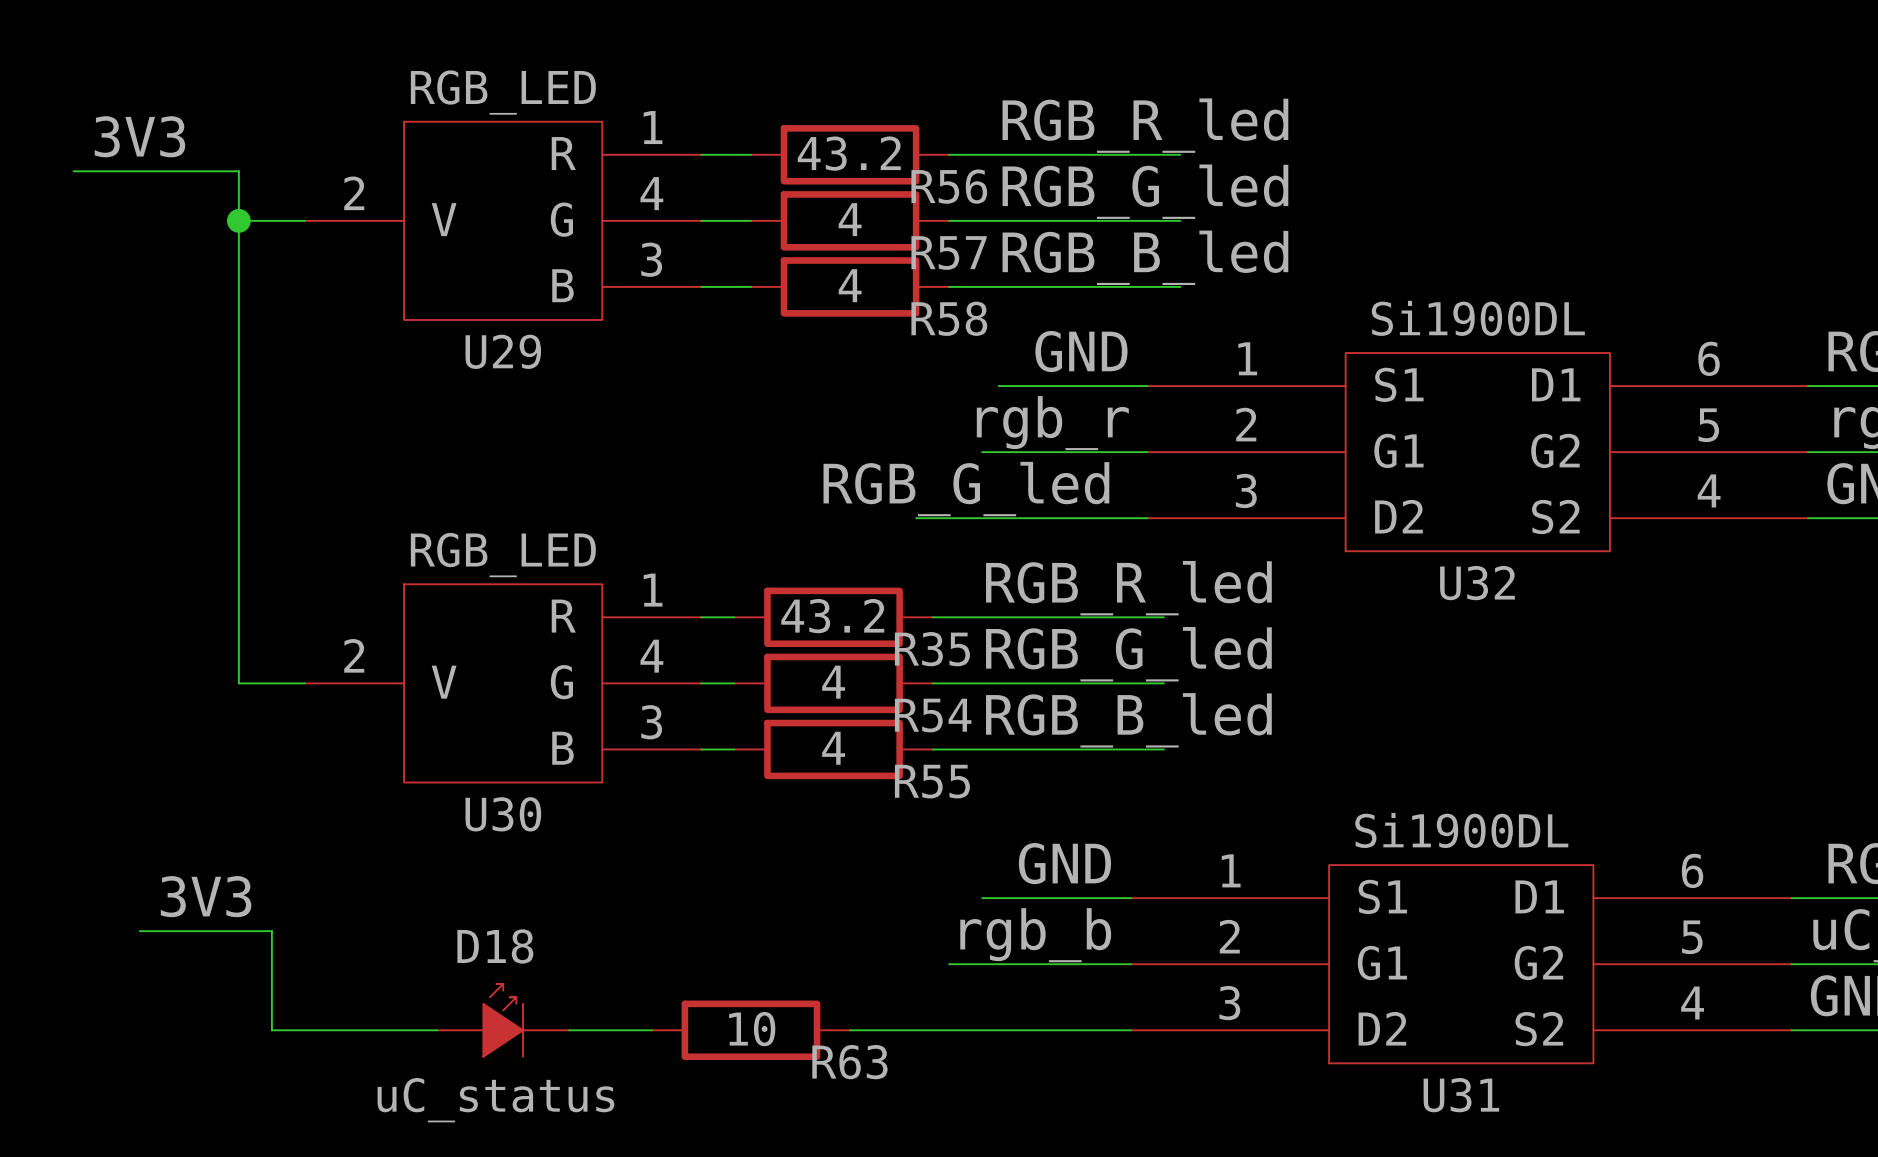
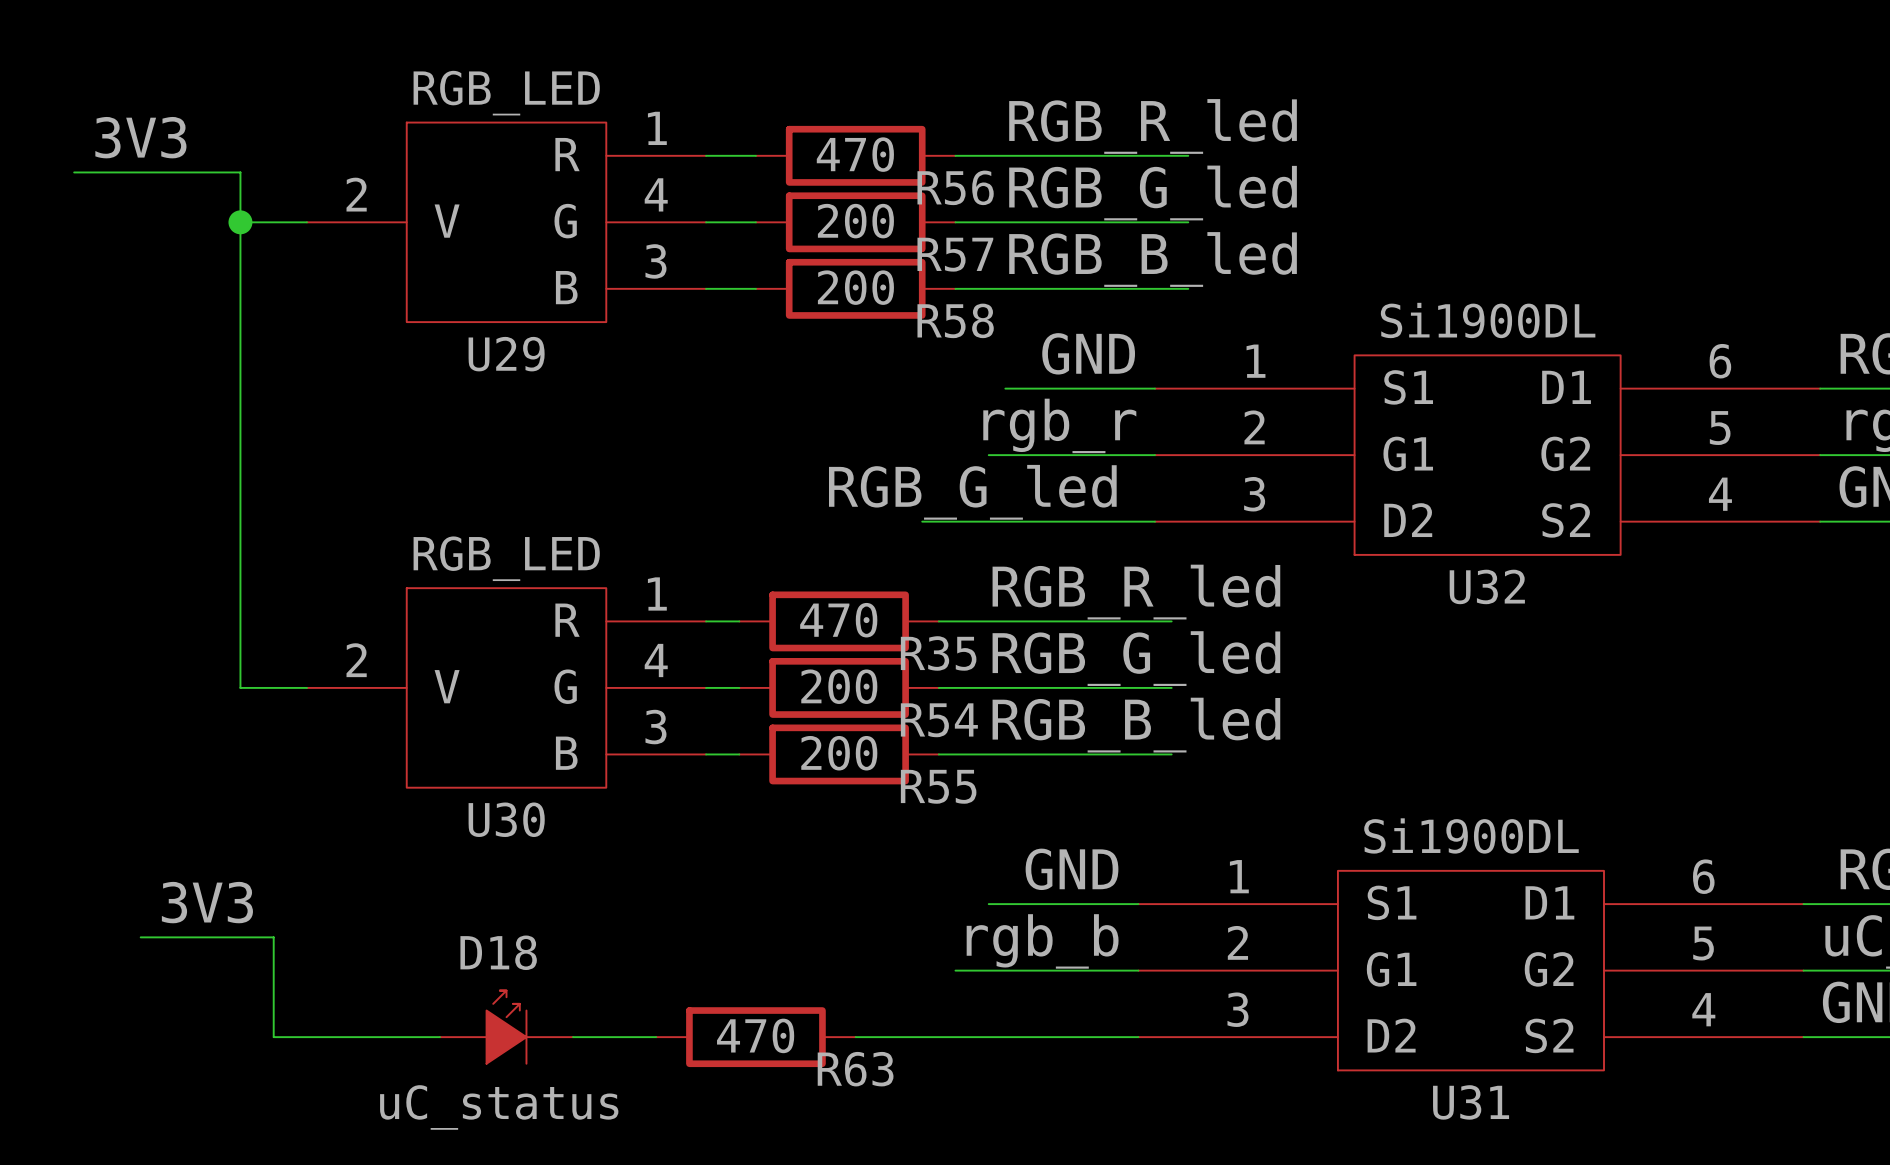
R56 value: 43.2 (849, 153) -> 470 (855, 154)
R57 value: 4 (850, 219) -> 200 (855, 221)
R58 value: 4 (850, 285) -> 200 (855, 287)
R35 value: 43.2 (832, 616) -> 470 (838, 620)
R54 value: 4 (833, 682) -> 200 (839, 686)
R55 value: 4 (833, 748) -> 200 (839, 753)
R63 value: 10 (752, 1029) -> 470 (755, 1035)

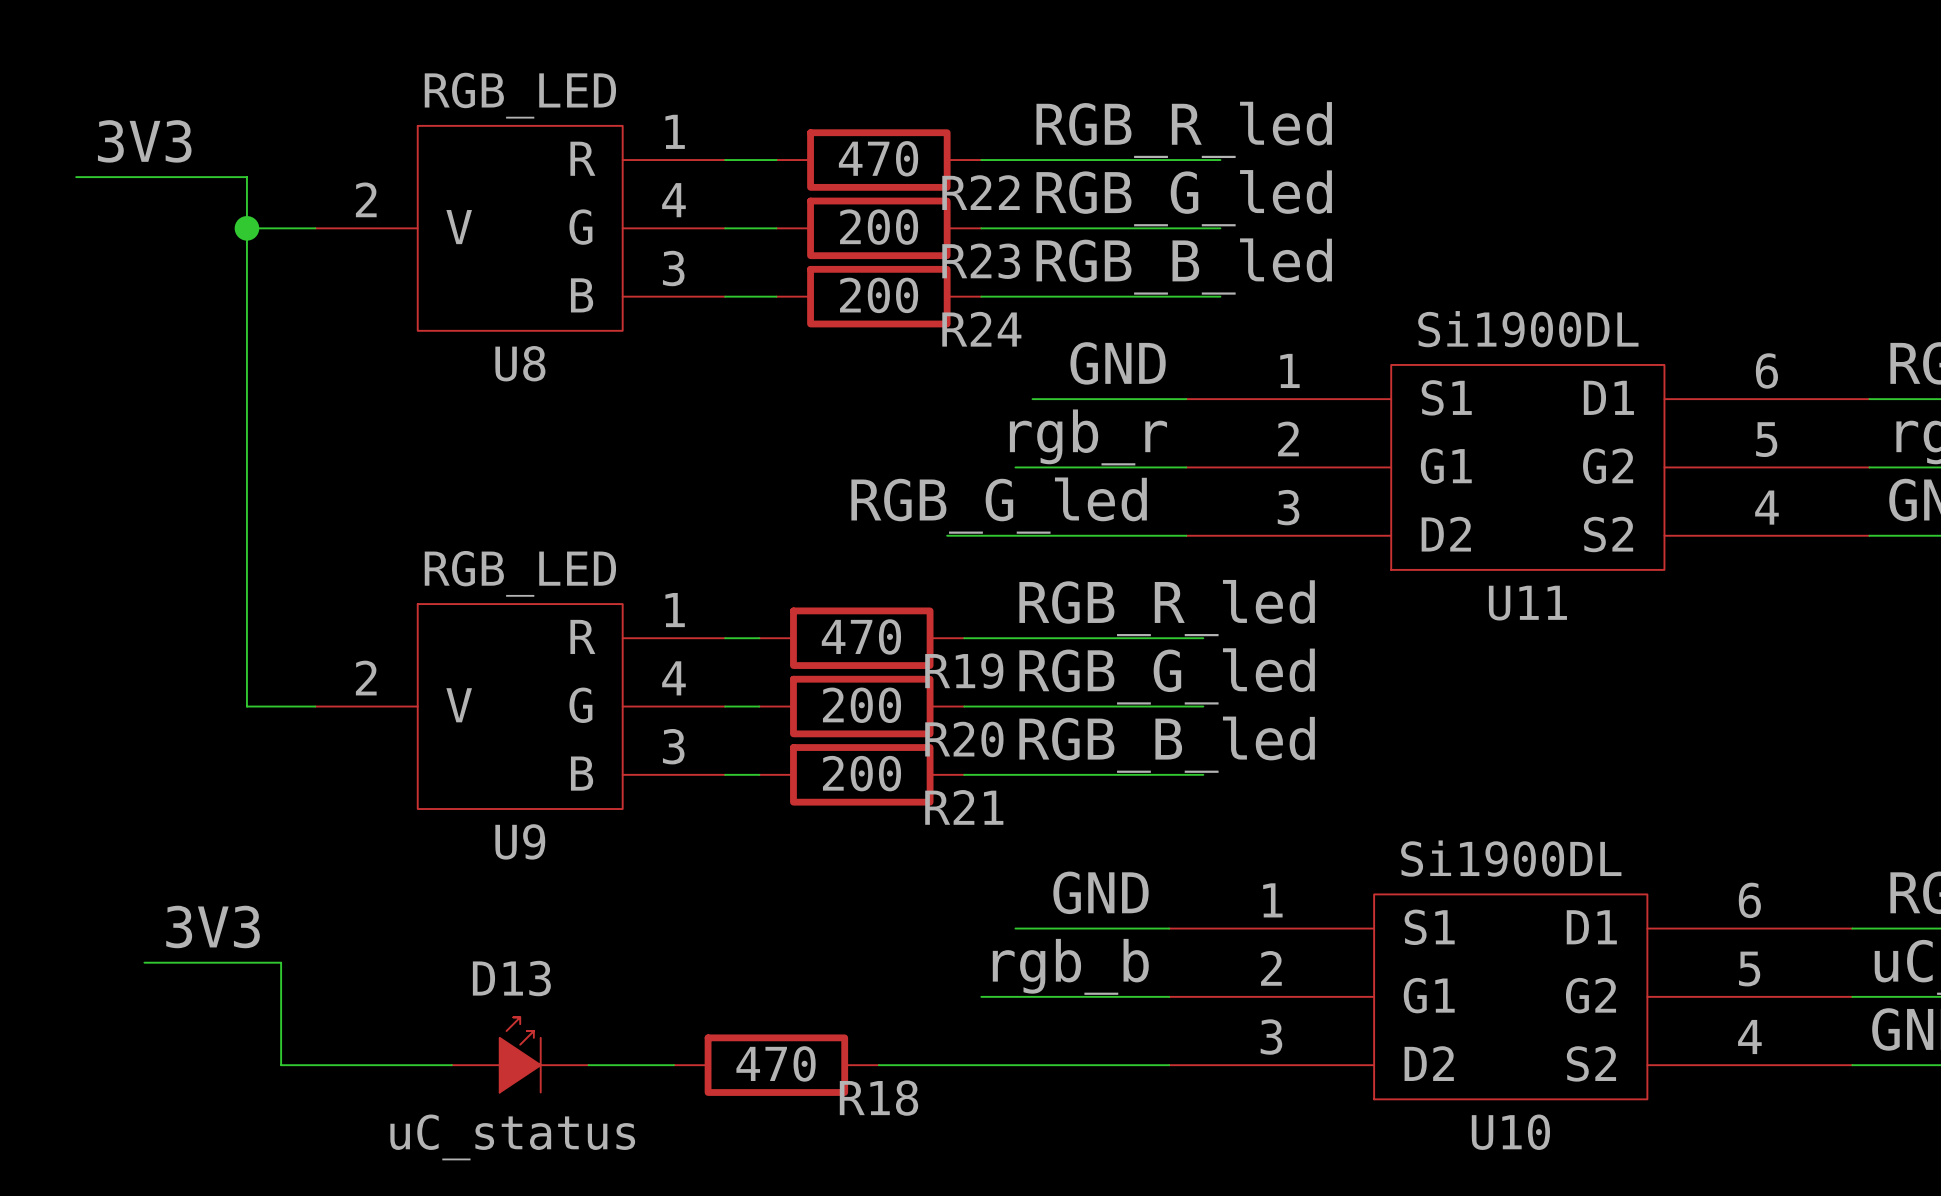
R56 name: R56 (955, 187) -> R22 (980, 192)
R57 name: R57 (955, 254) -> R23 (981, 261)
R58 name: R58 (955, 320) -> R24 (981, 329)
U29 name: U29 (506, 354) -> U8 (520, 363)
U32 name: U32 (1487, 586) -> U11 (1527, 603)
R35 name: R35 (938, 653) -> R19 (964, 671)
R54 name: R54 (939, 720) -> R20 (964, 739)
R55 name: R55 (938, 786) -> R21 (964, 807)
U30 name: U30 (506, 819) -> U9 (520, 841)
D18 name: D18 (498, 952) -> D13 (511, 978)
R63 name: R63 (855, 1069) -> R18 (878, 1098)
U31 name: U31 (1471, 1102) -> U10 (1510, 1132)

